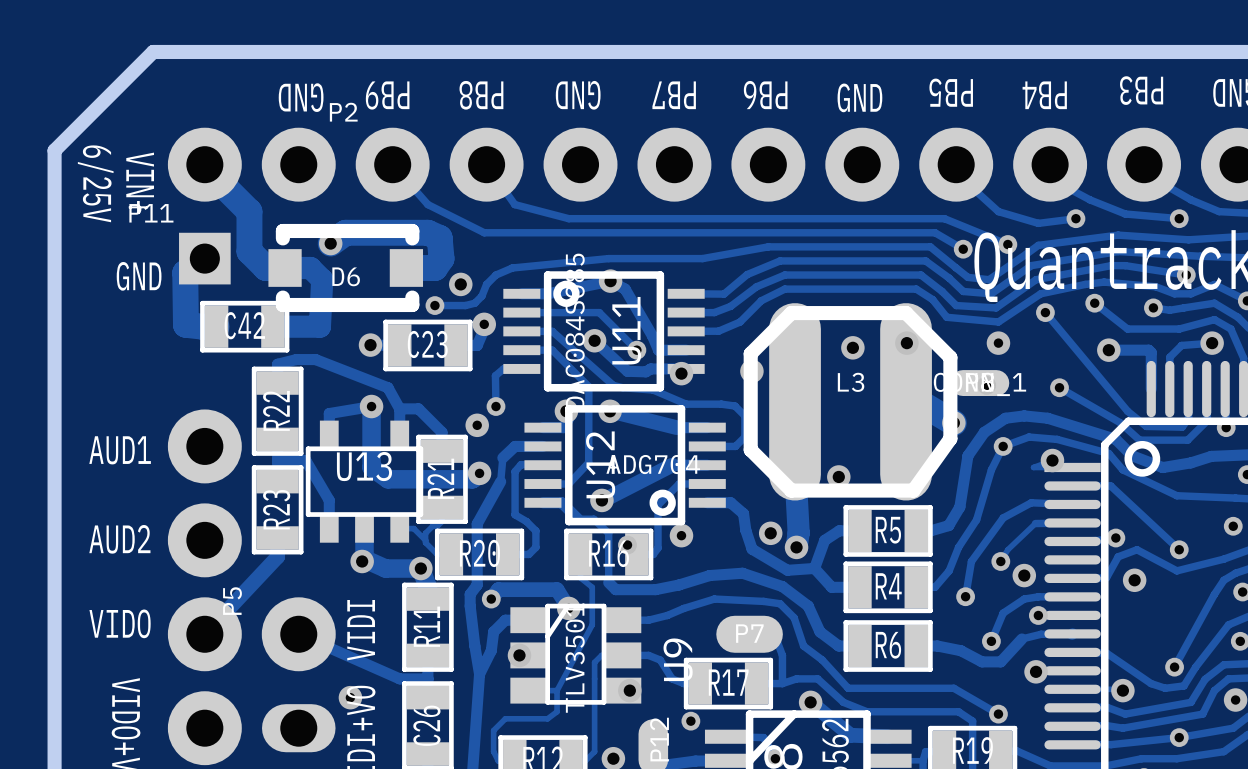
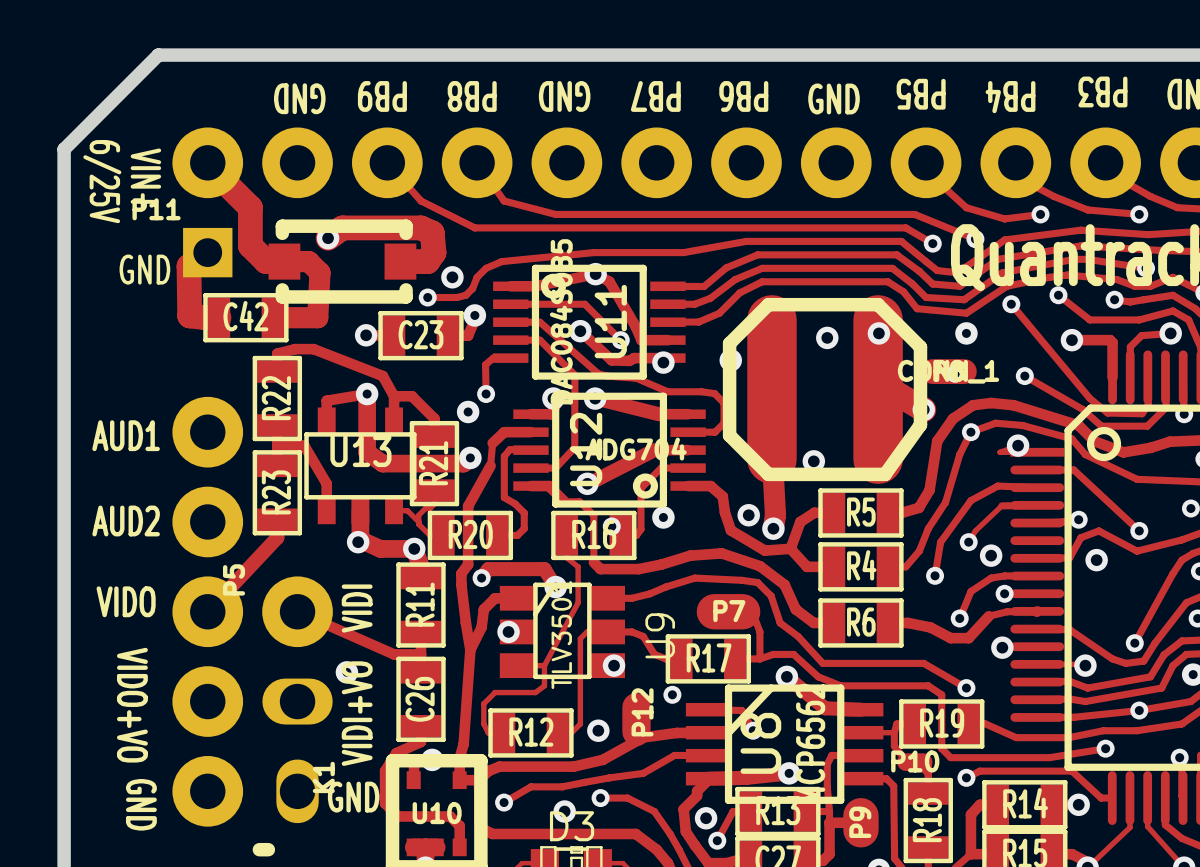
P2 name: P2 (343, 112) -> none
D6 name: D6 (346, 276) -> none
L3 name: L3 (851, 382) -> none

